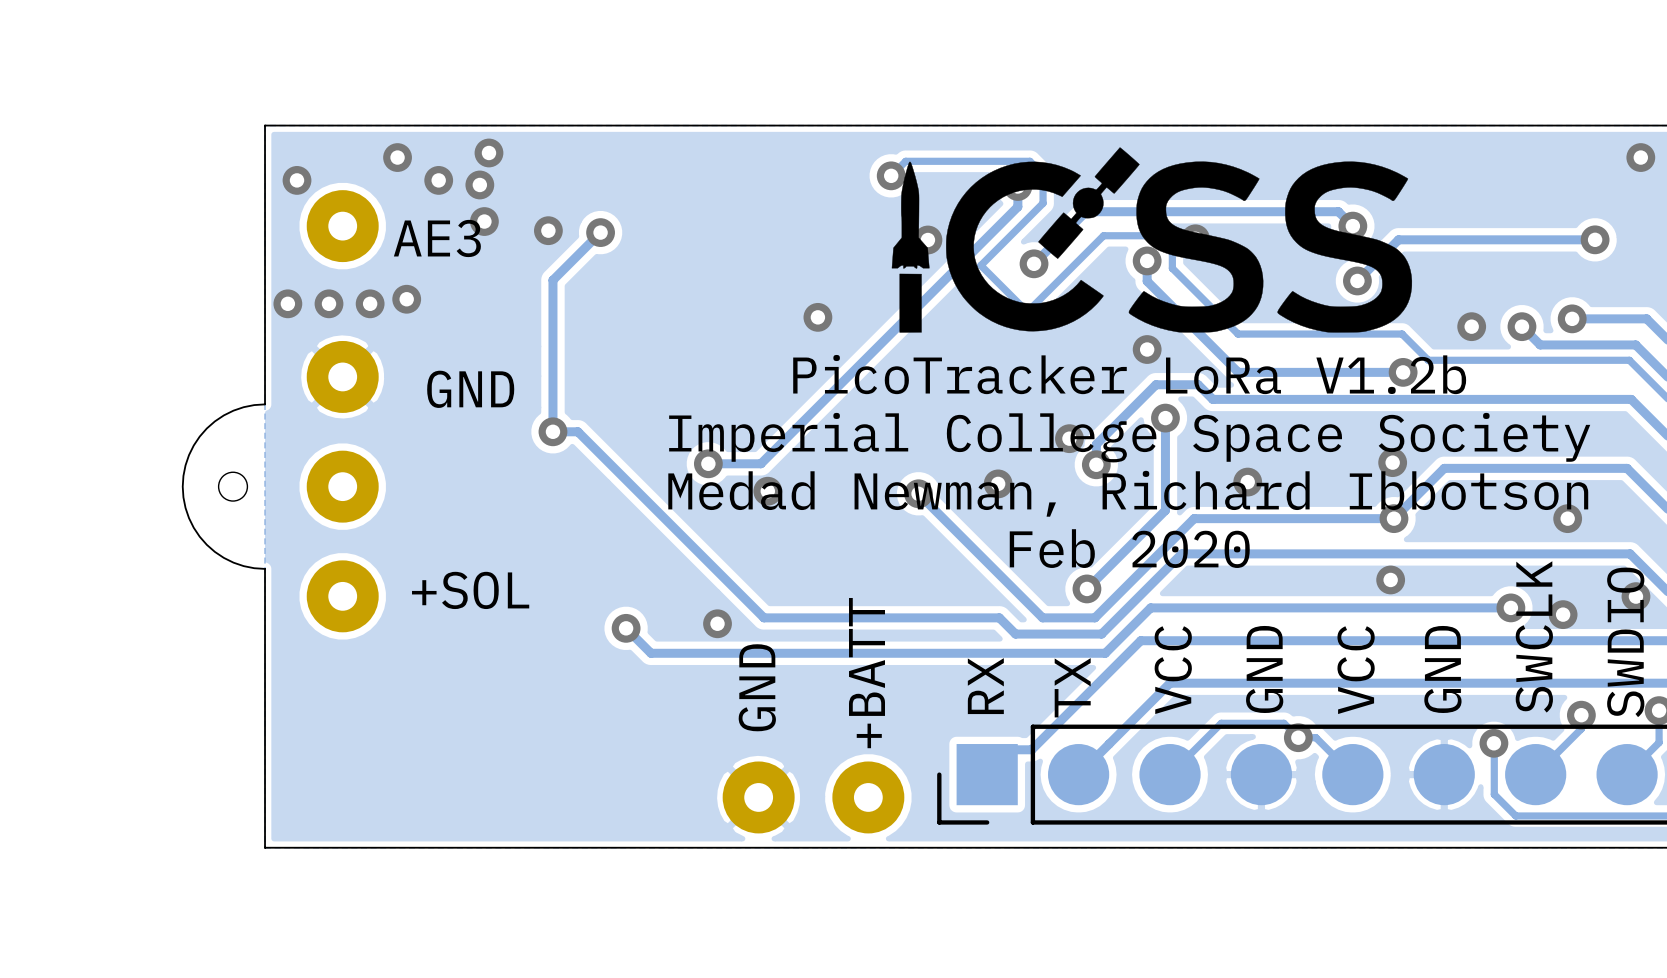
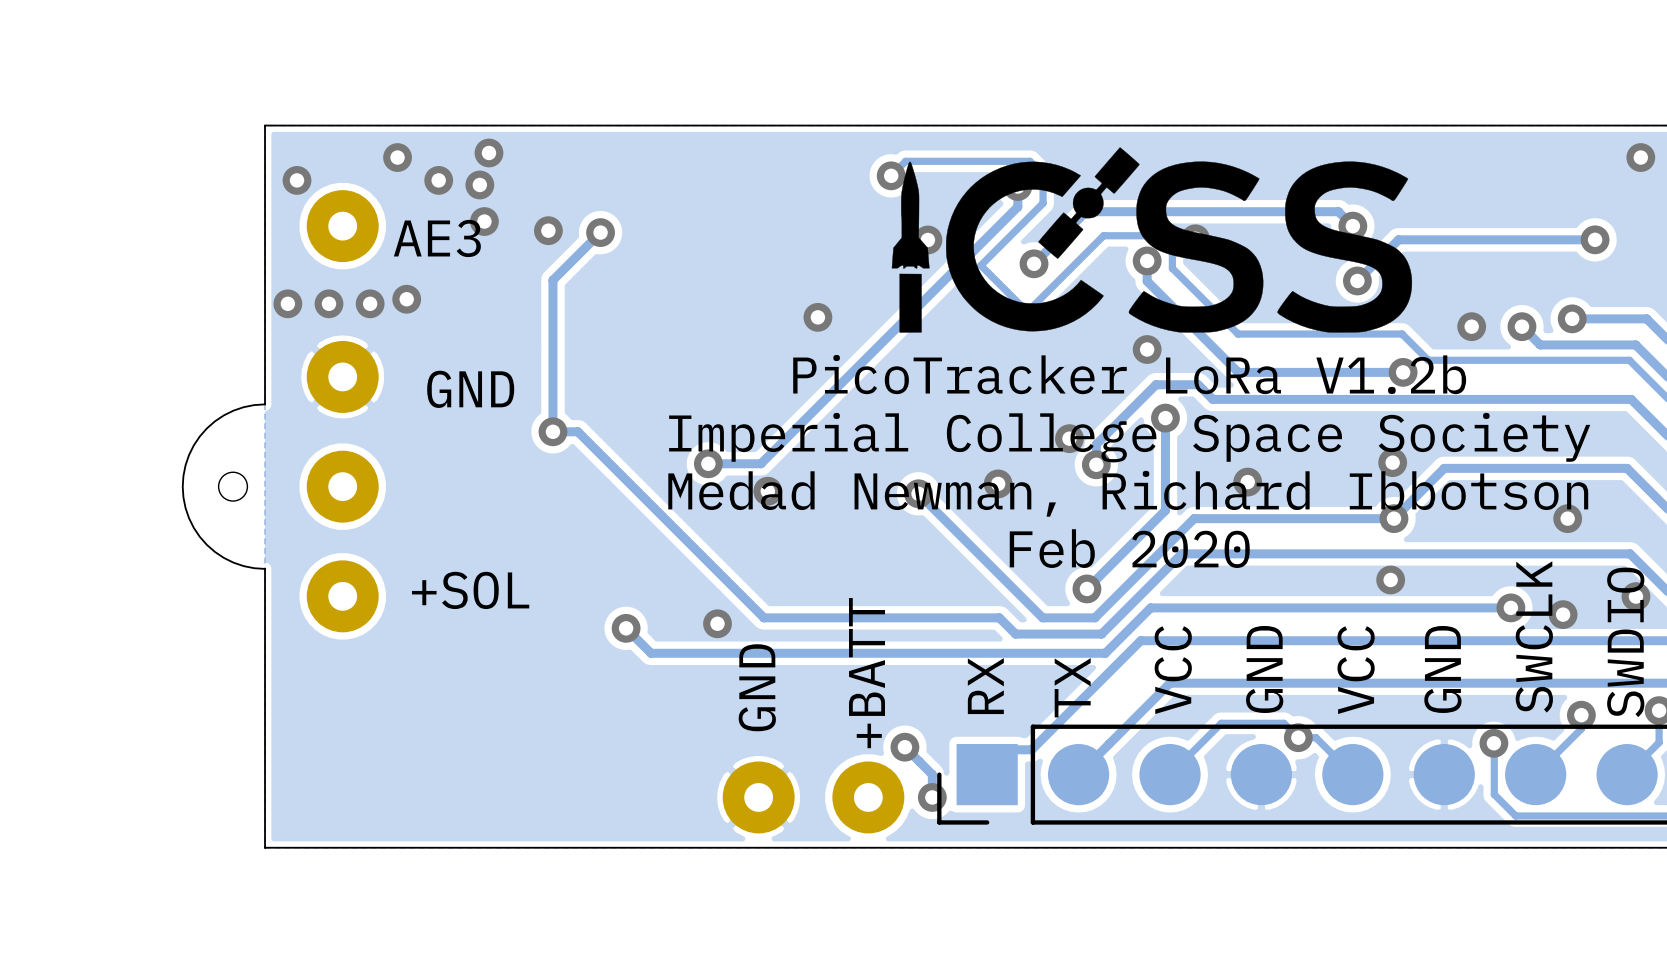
track: none -> (904, 747) (932, 774) (932, 797)
via: none -> (904, 747)
via: none -> (932, 797)

